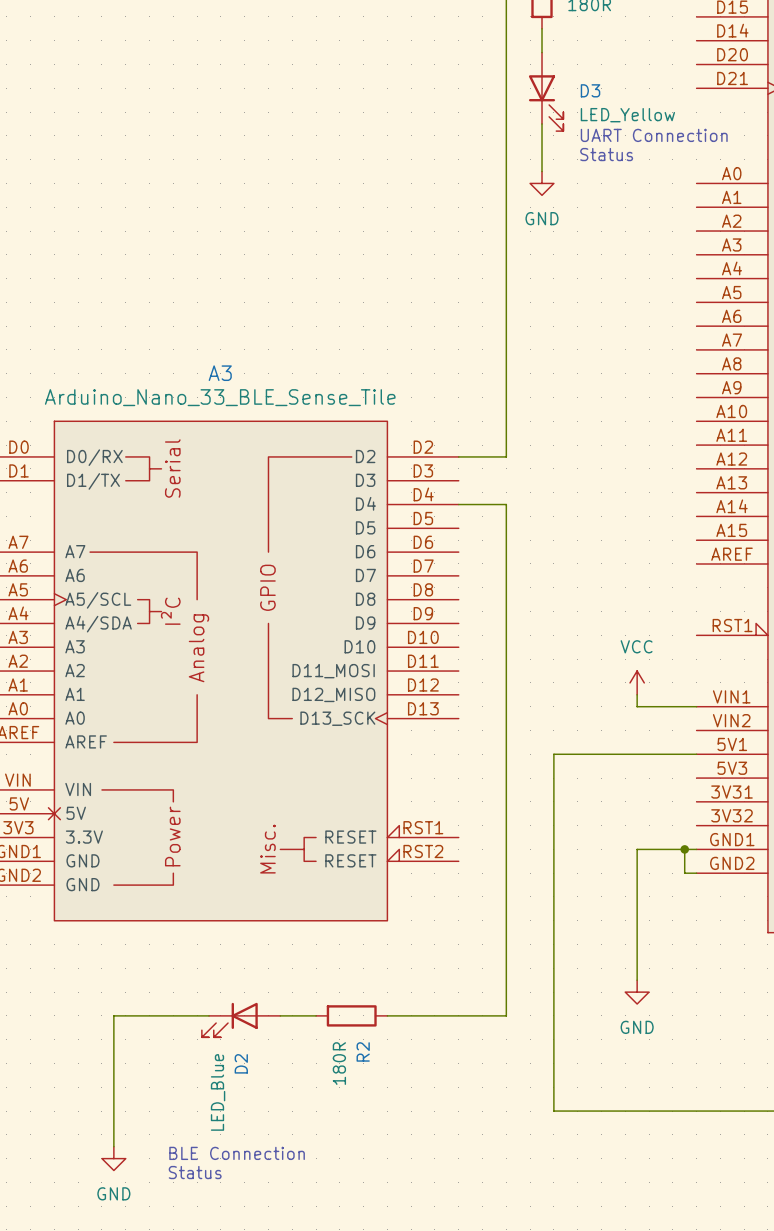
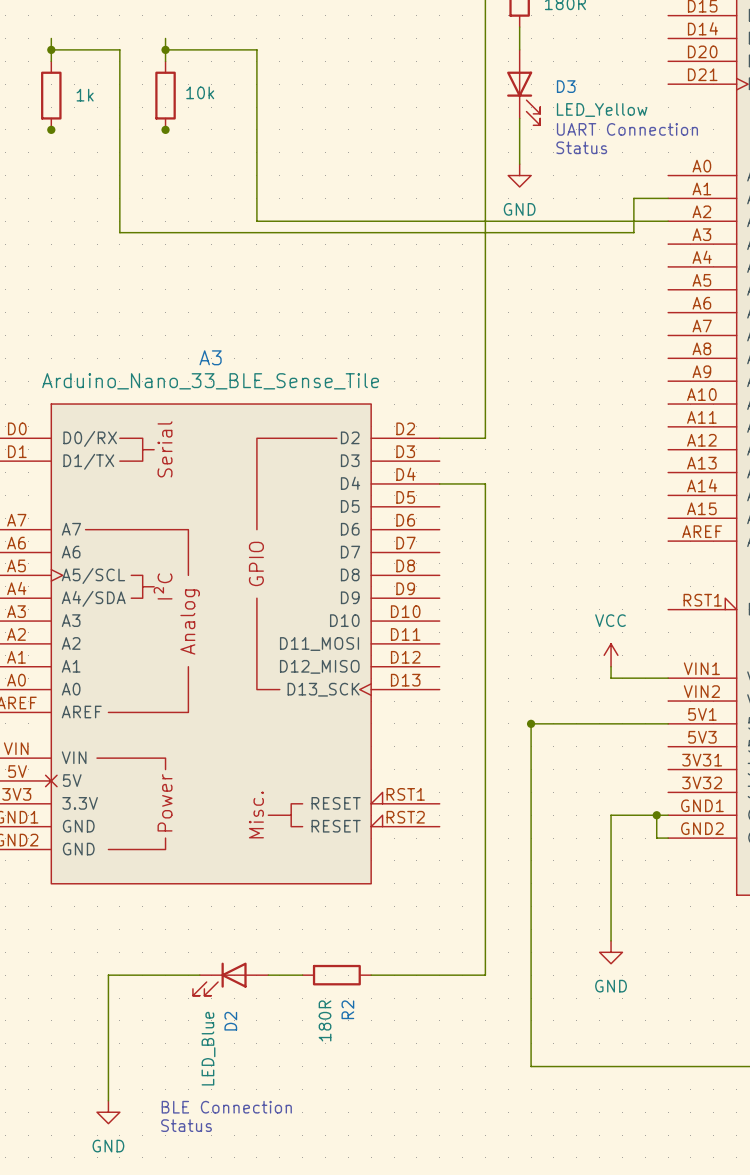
wire: none -> (51, 38) (51, 61)
wire: none -> (165, 38) (165, 61)
wire: none -> (51, 49) (119, 49) (119, 232) (633, 232) (633, 198) (668, 198)
junction: none -> (51, 49)
wire: none -> (165, 49) (256, 49) (256, 221) (668, 221)
junction: none -> (165, 49)
part: none -> 1k (51, 95)
part: none -> 10k (165, 95)
junction: none -> (51, 129)
junction: none -> (165, 129)
junction: none -> (531, 723)

